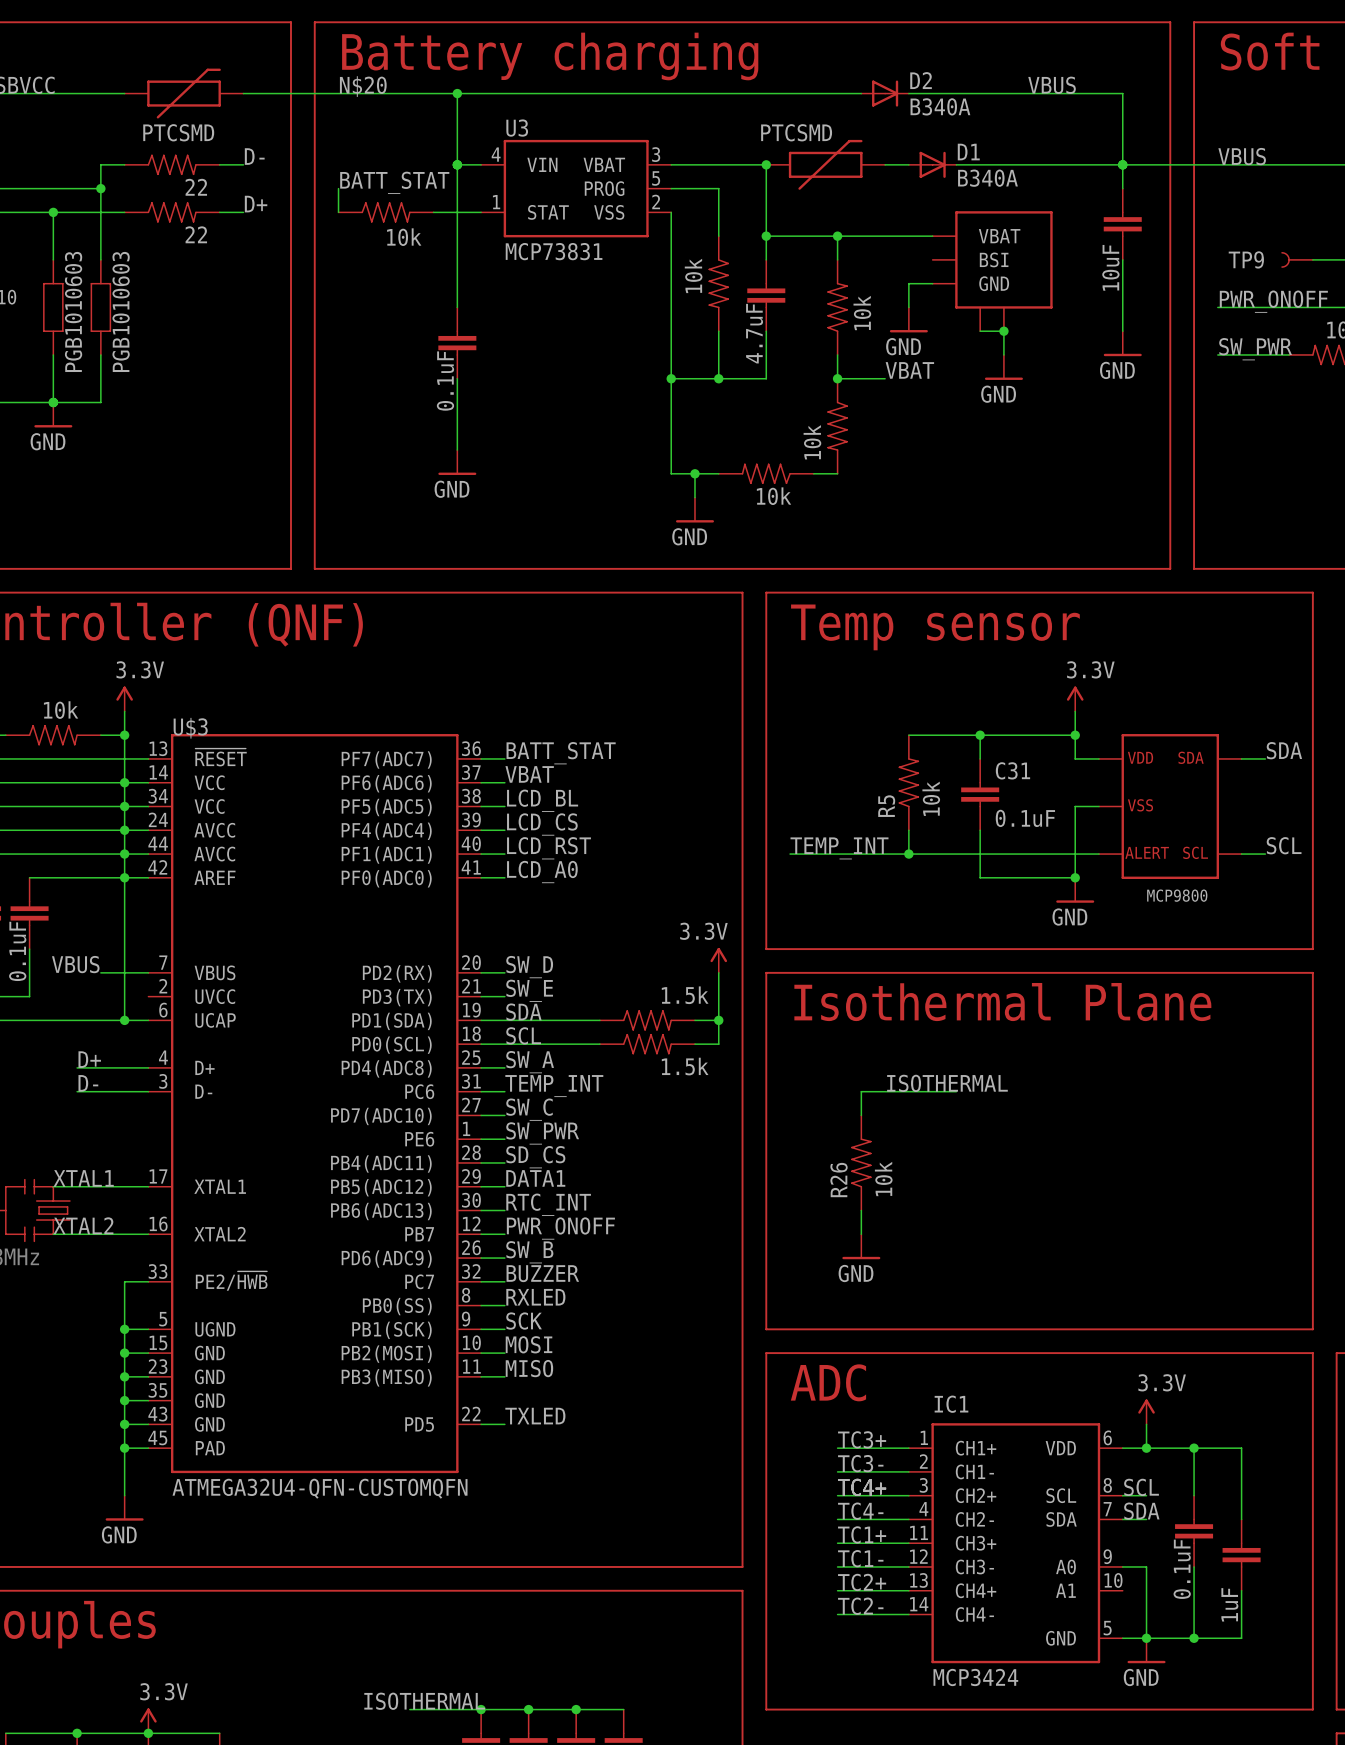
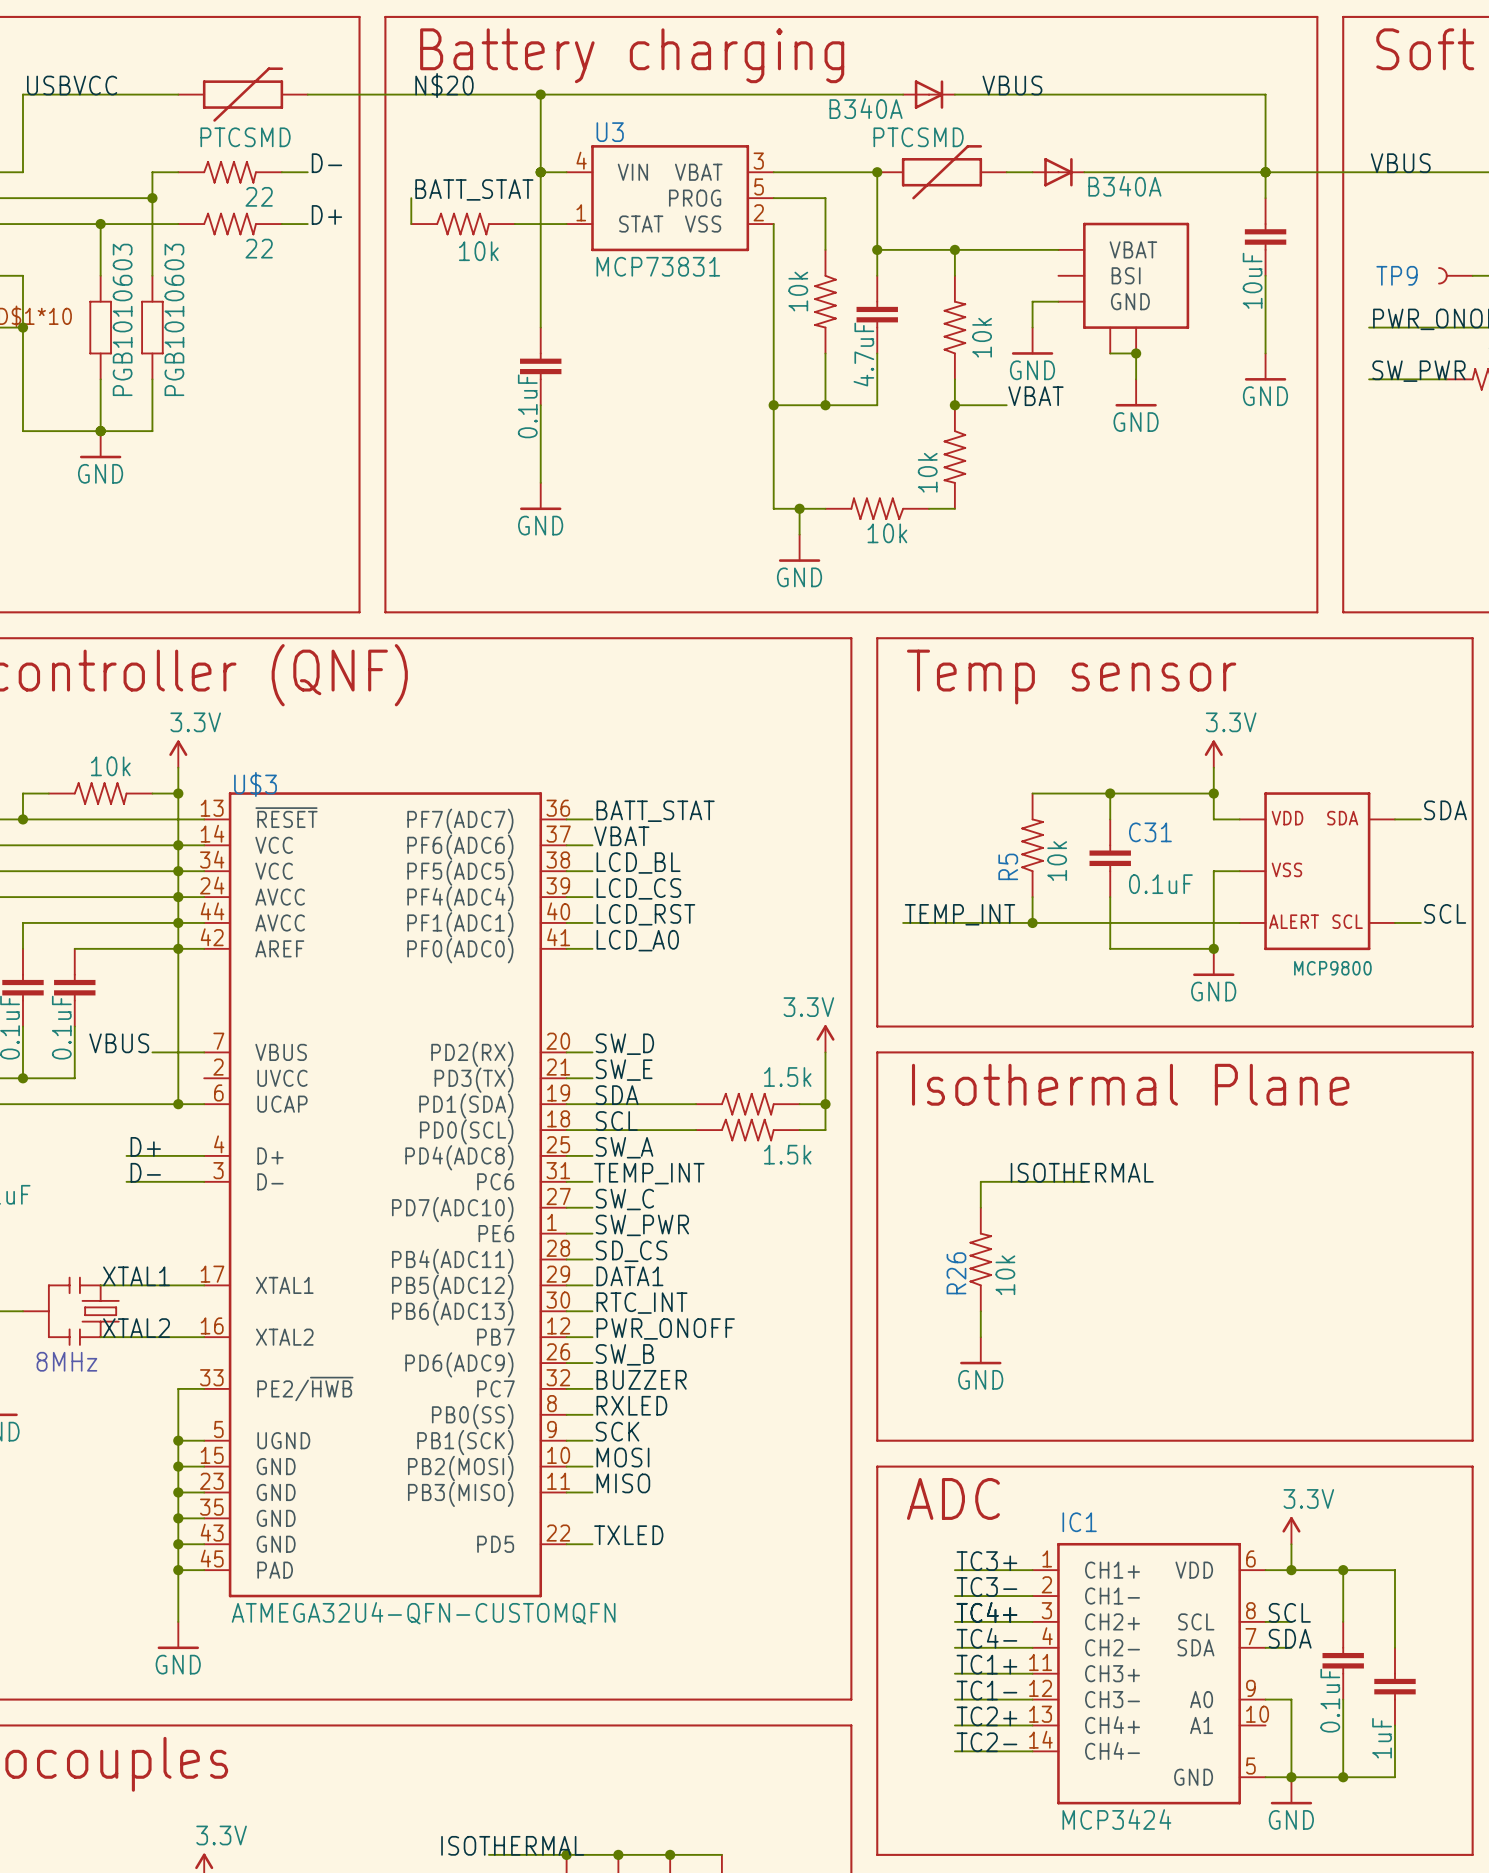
label position: VBUS (1052, 85) -> VBUS (1012, 85)
part: none -> B340A (929, 94)
D2: B340A (885, 93) -> none
D1 name: D1 (968, 152) -> none

